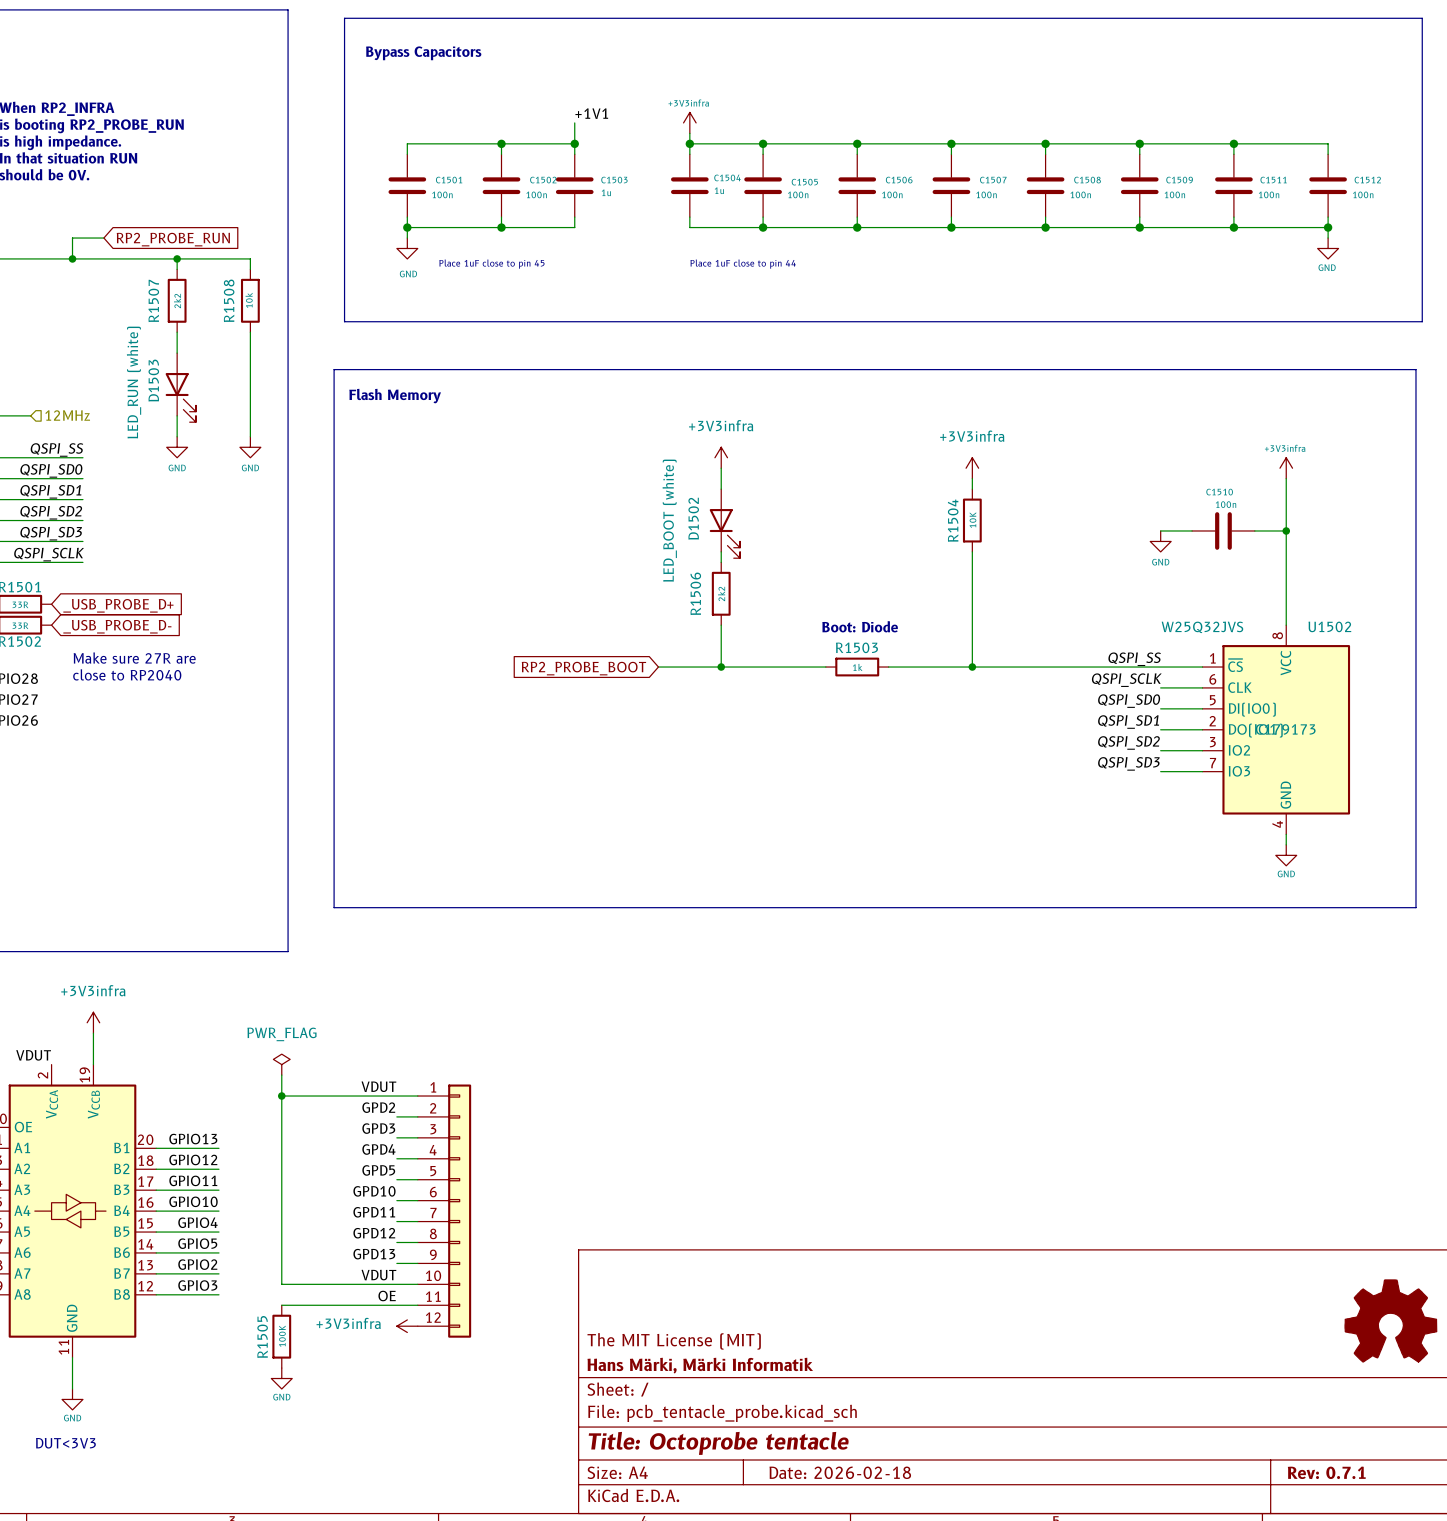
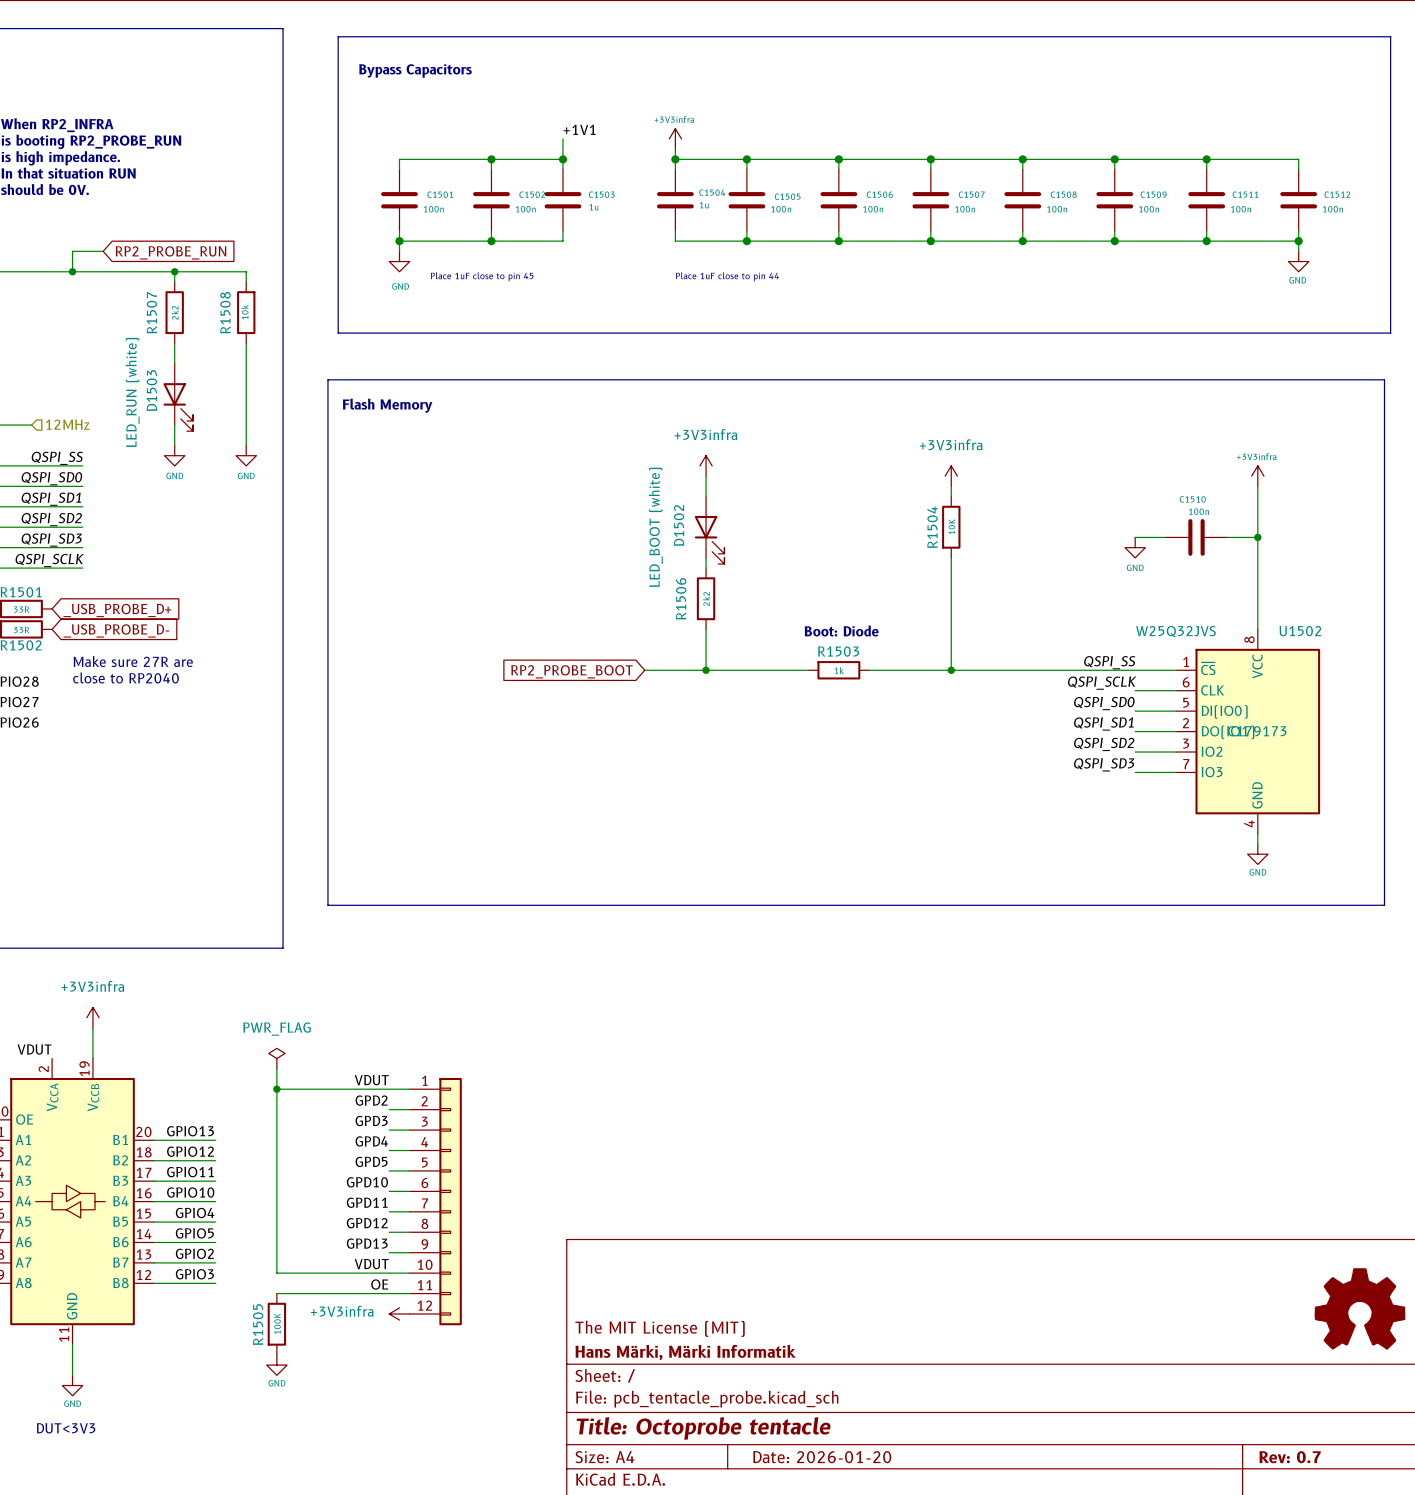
title block: Date: 2026-02-18 (840, 1472) -> Date: 2026-01-20 (822, 1457)
title block: Rev: 0.7.1 (1326, 1472) -> Rev: 0.7 (1290, 1457)

